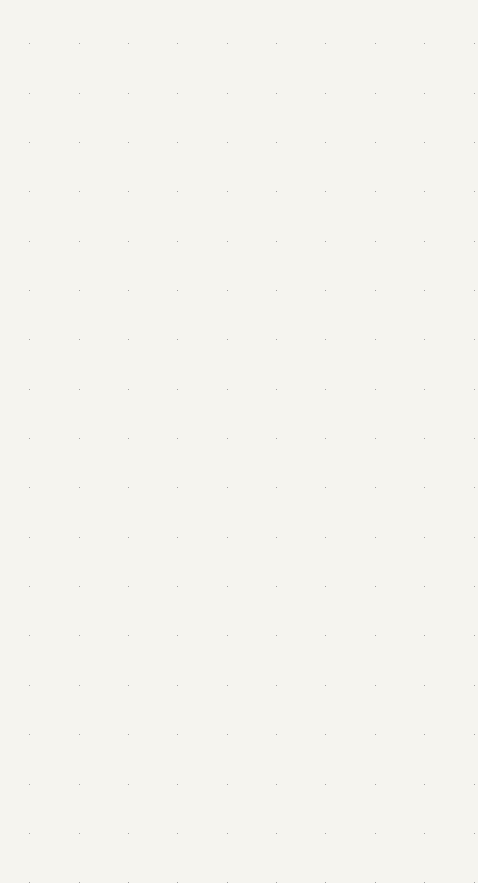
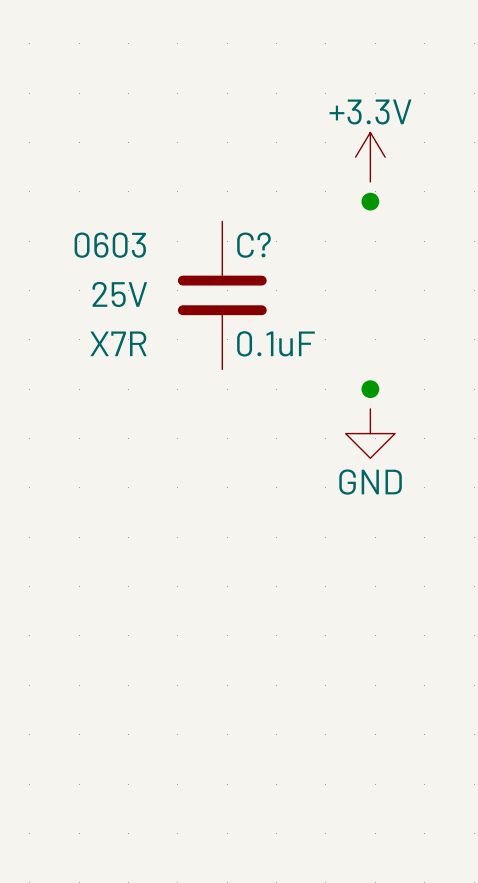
power symbol: none -> +3.3V (370, 157)
junction: none -> (370, 201)
C?: none -> 0.1uF (222, 295)
junction: none -> (370, 389)
power symbol: none -> GND (370, 433)

